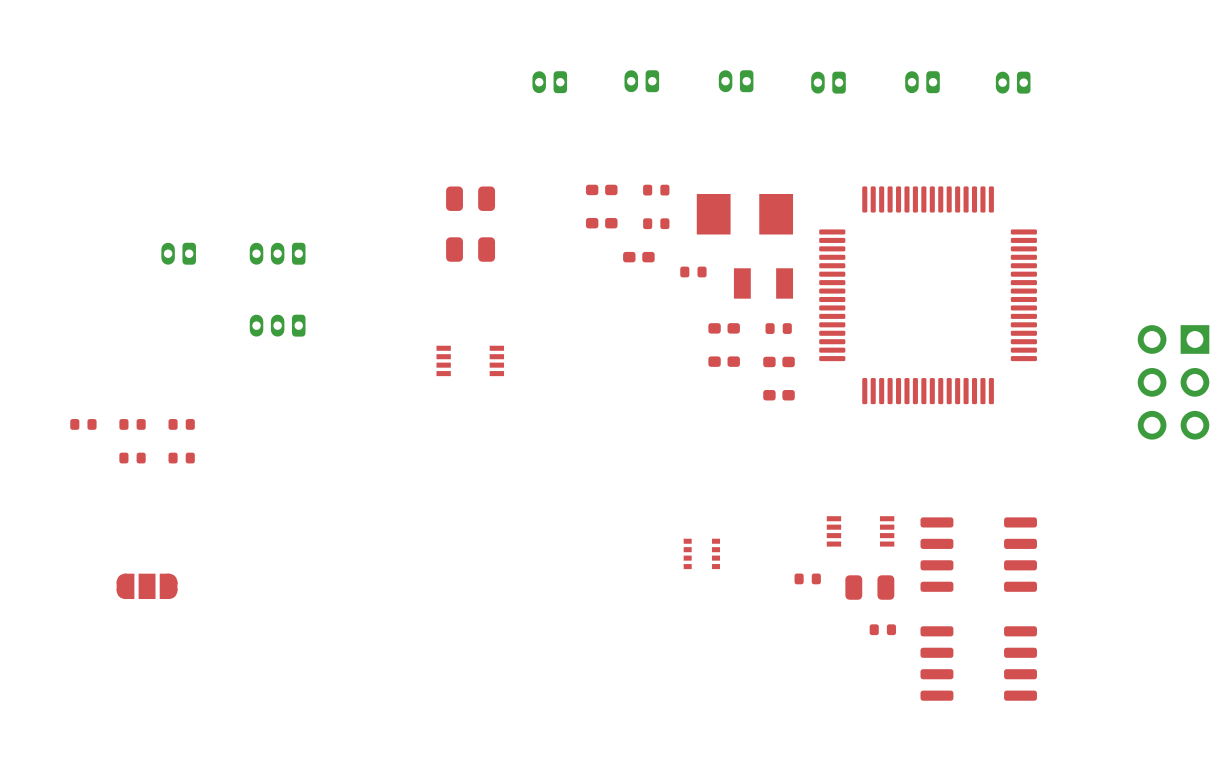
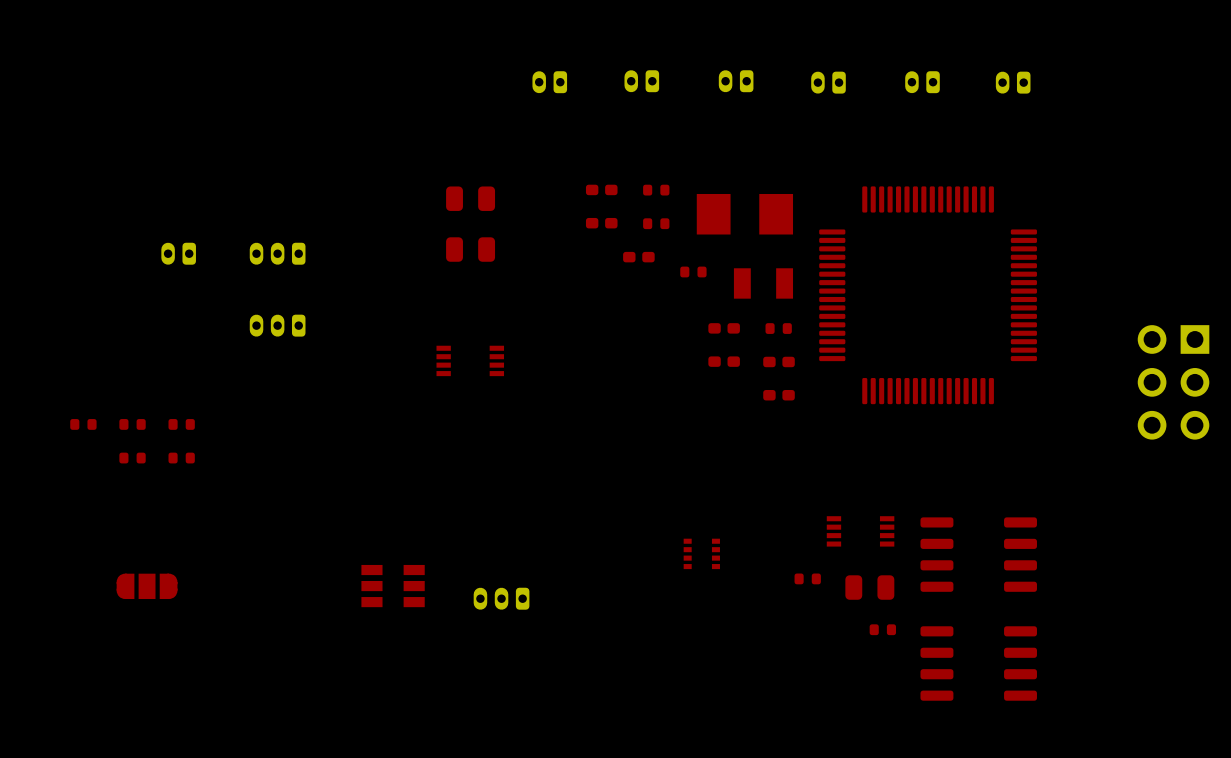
part: none -> (393, 586)
part: none -> (501, 598)

